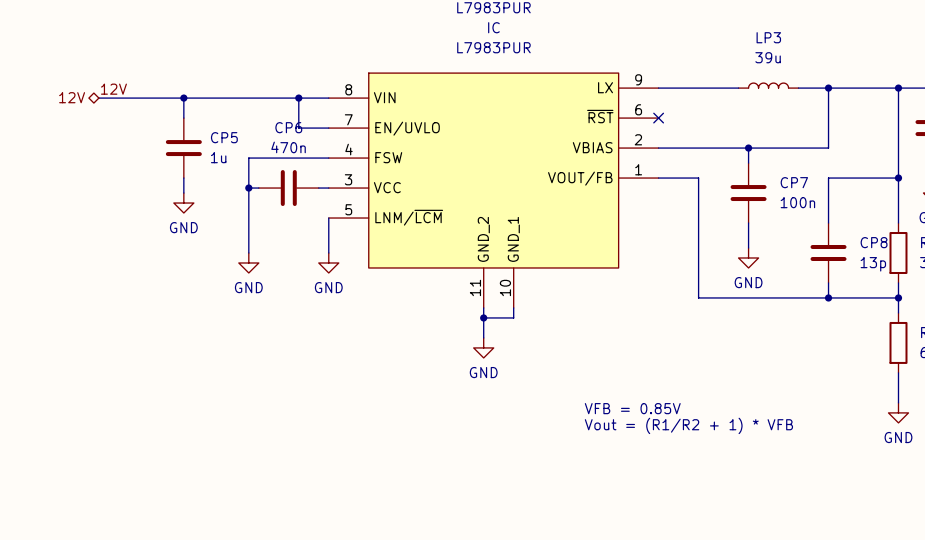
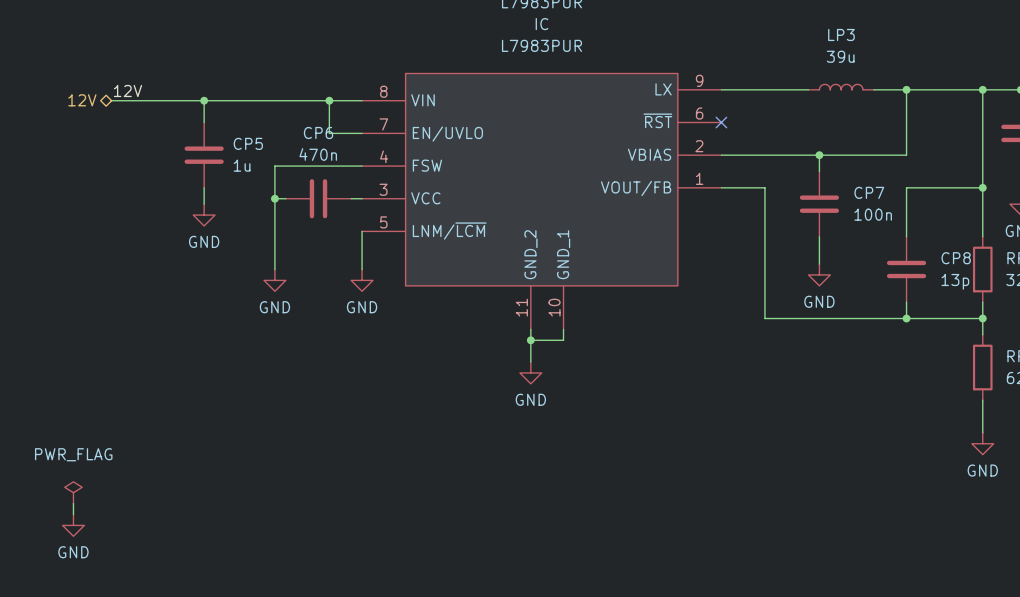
text: VFB = 0.85V (632, 408) -> none
text: Vout = (R1/R2 + 1) * VFB (688, 425) -> none
power symbol: none -> PWR_FLAG (73, 492)
wire: none -> (73, 503) (73, 514)
power symbol: none -> GND (73, 525)

